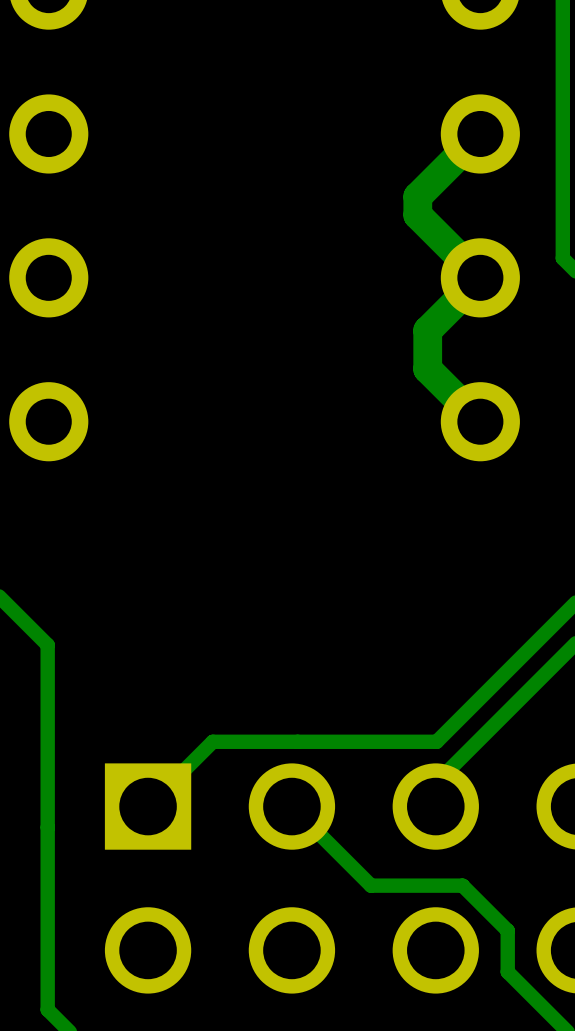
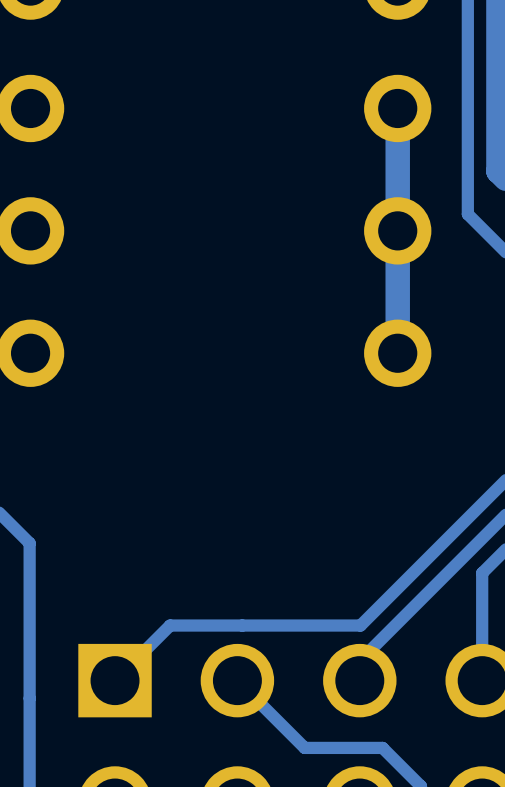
track: (480, 133) (417, 196) (417, 215) (480, 277) (427, 330) (427, 369) (480, 421) -> (397, 108) (397, 353)

